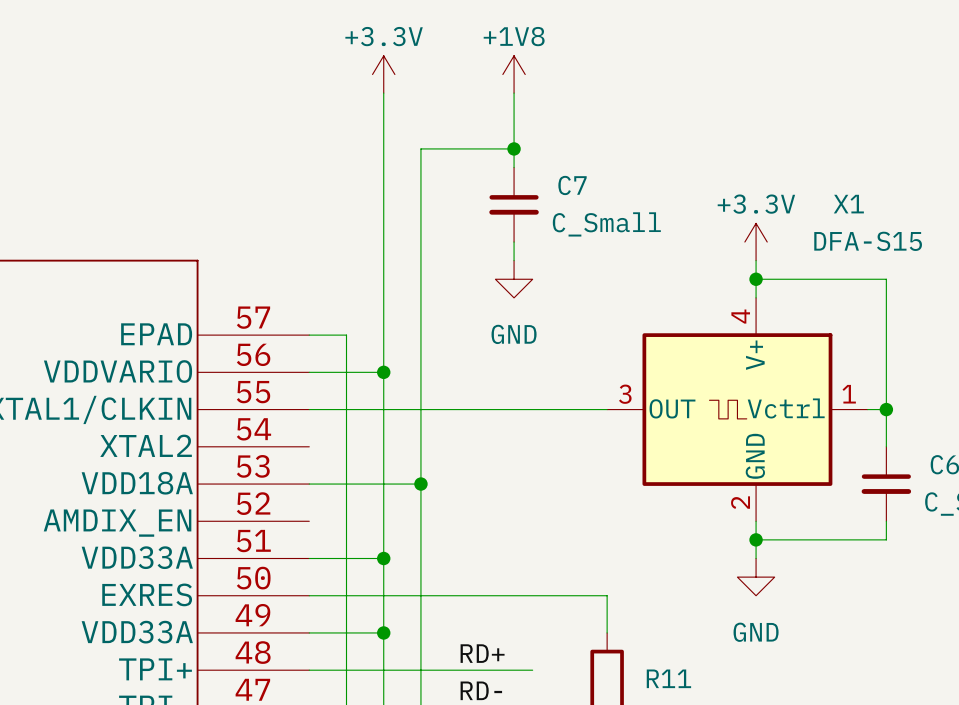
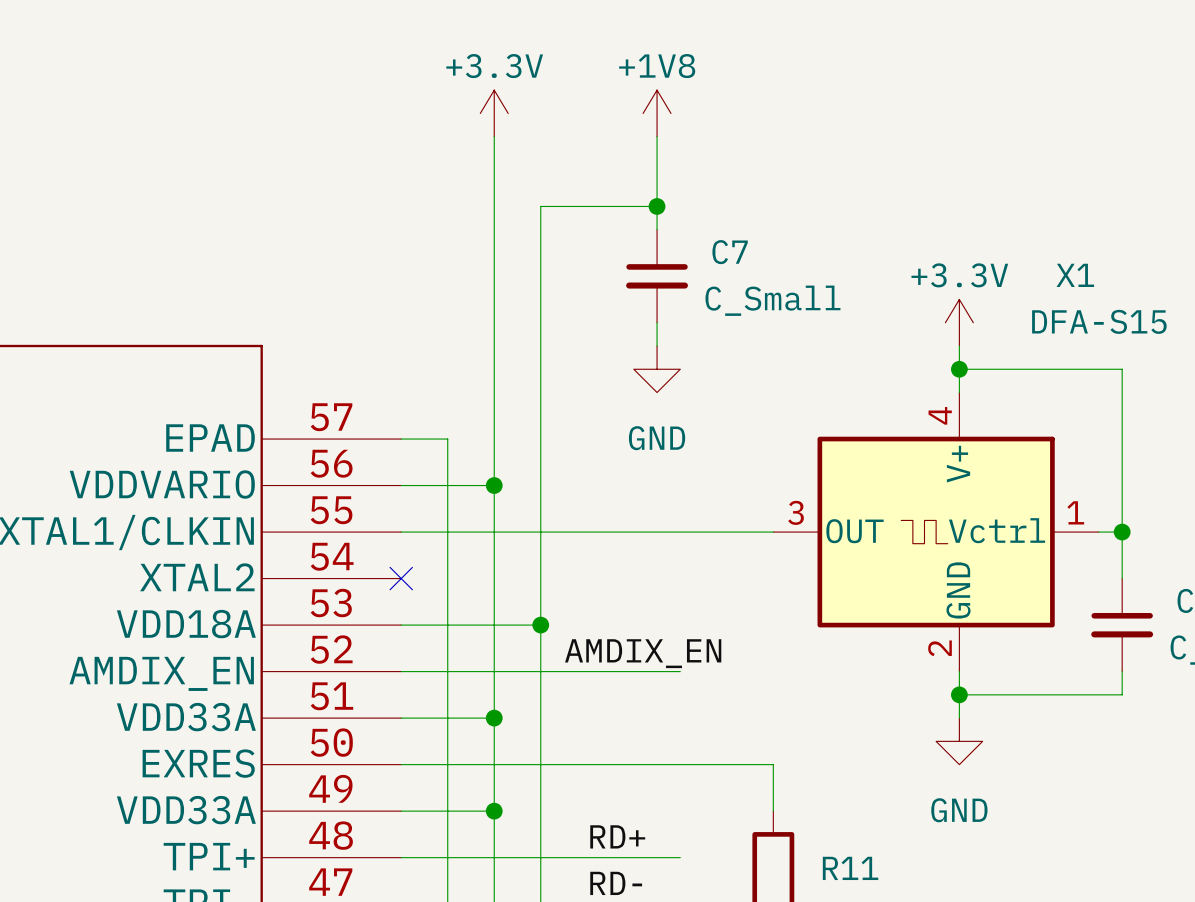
no-connect mark: none -> (401, 578)
label: none -> AMDIX_EN (643, 653)
wire: none -> (401, 671) (680, 671)

